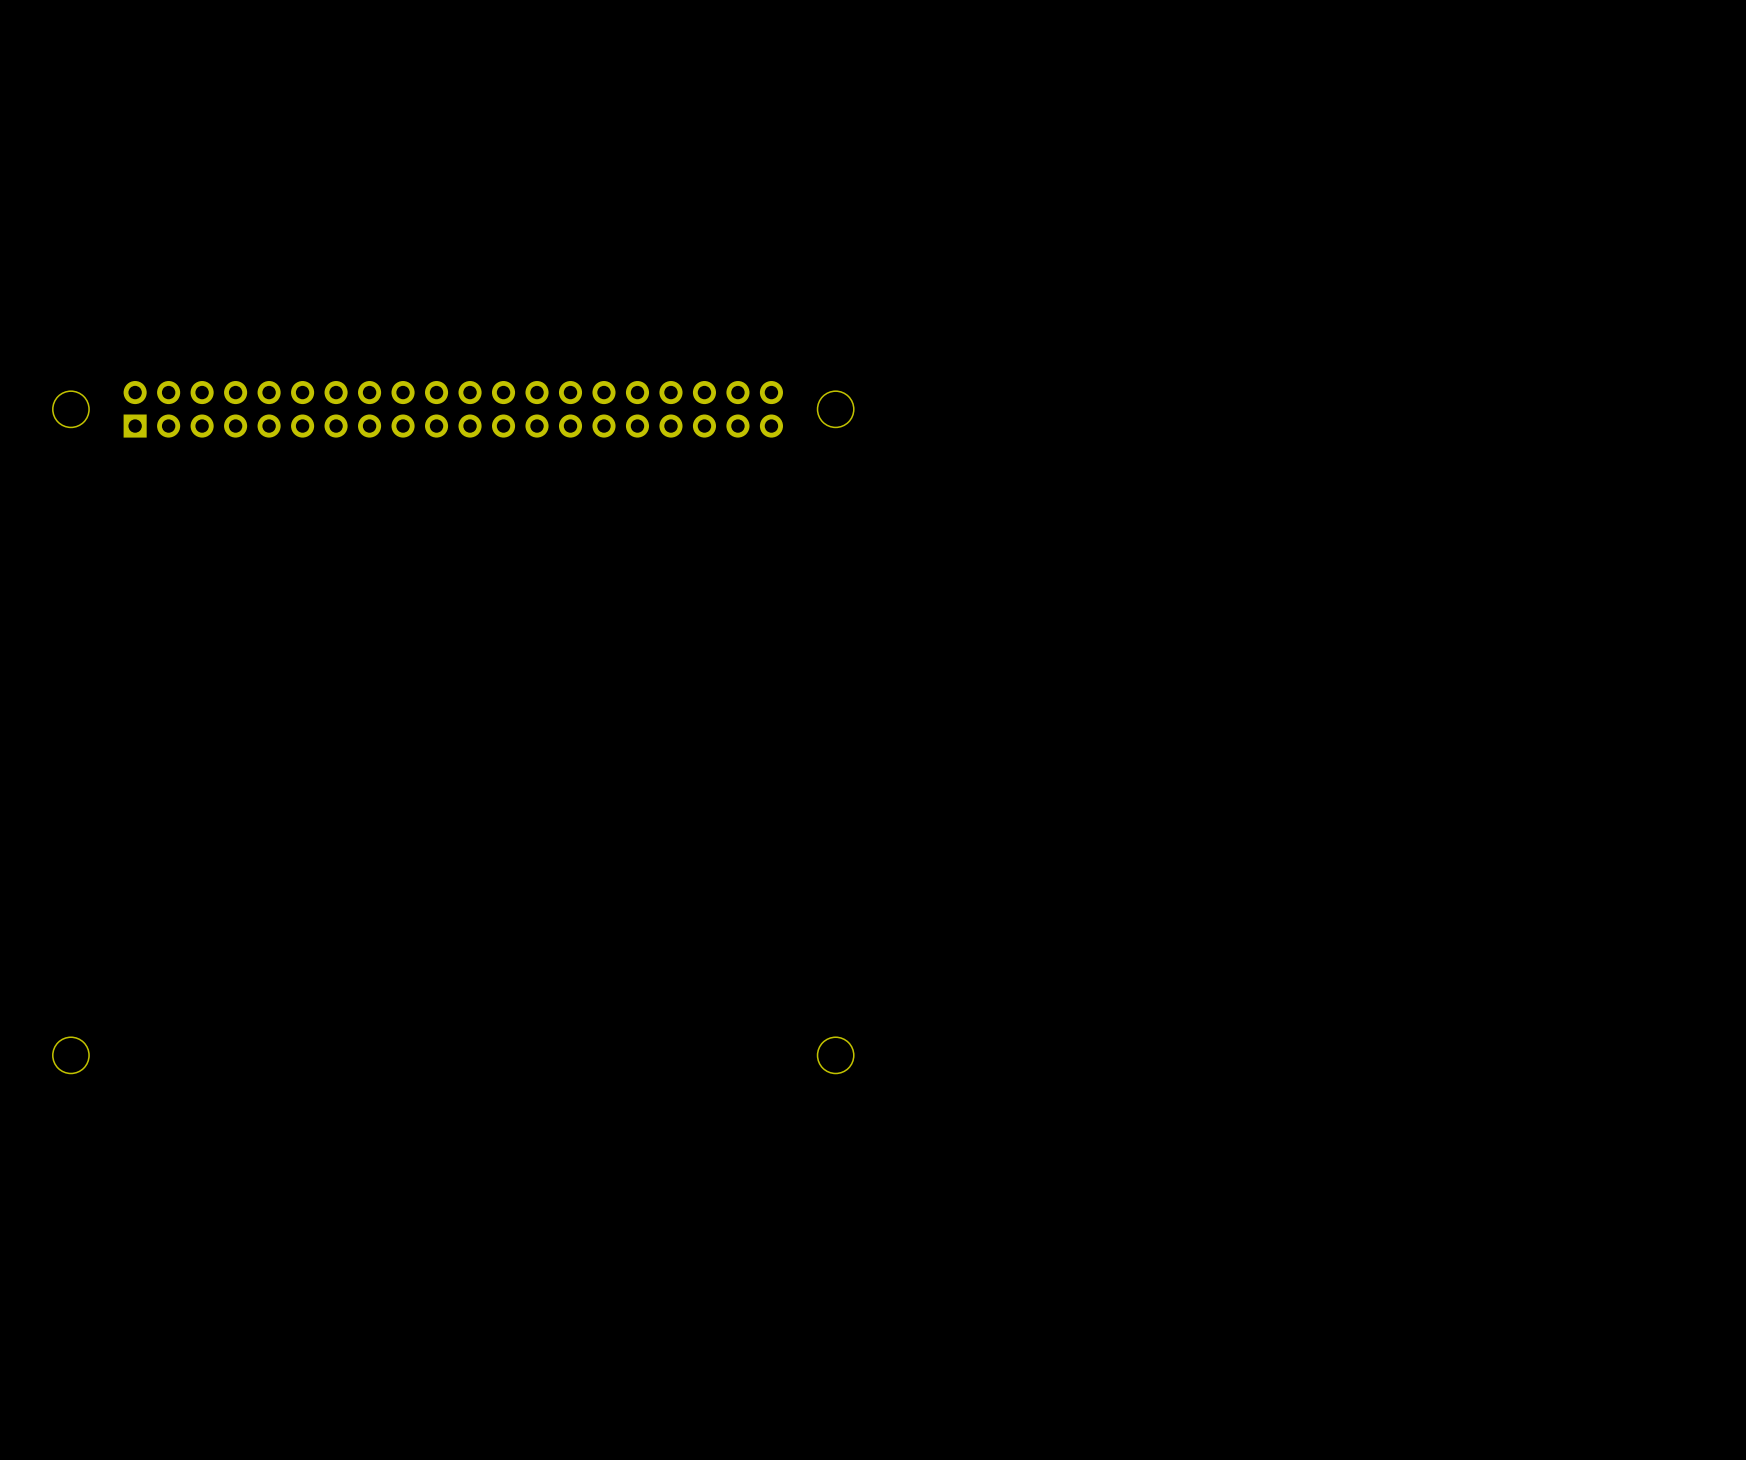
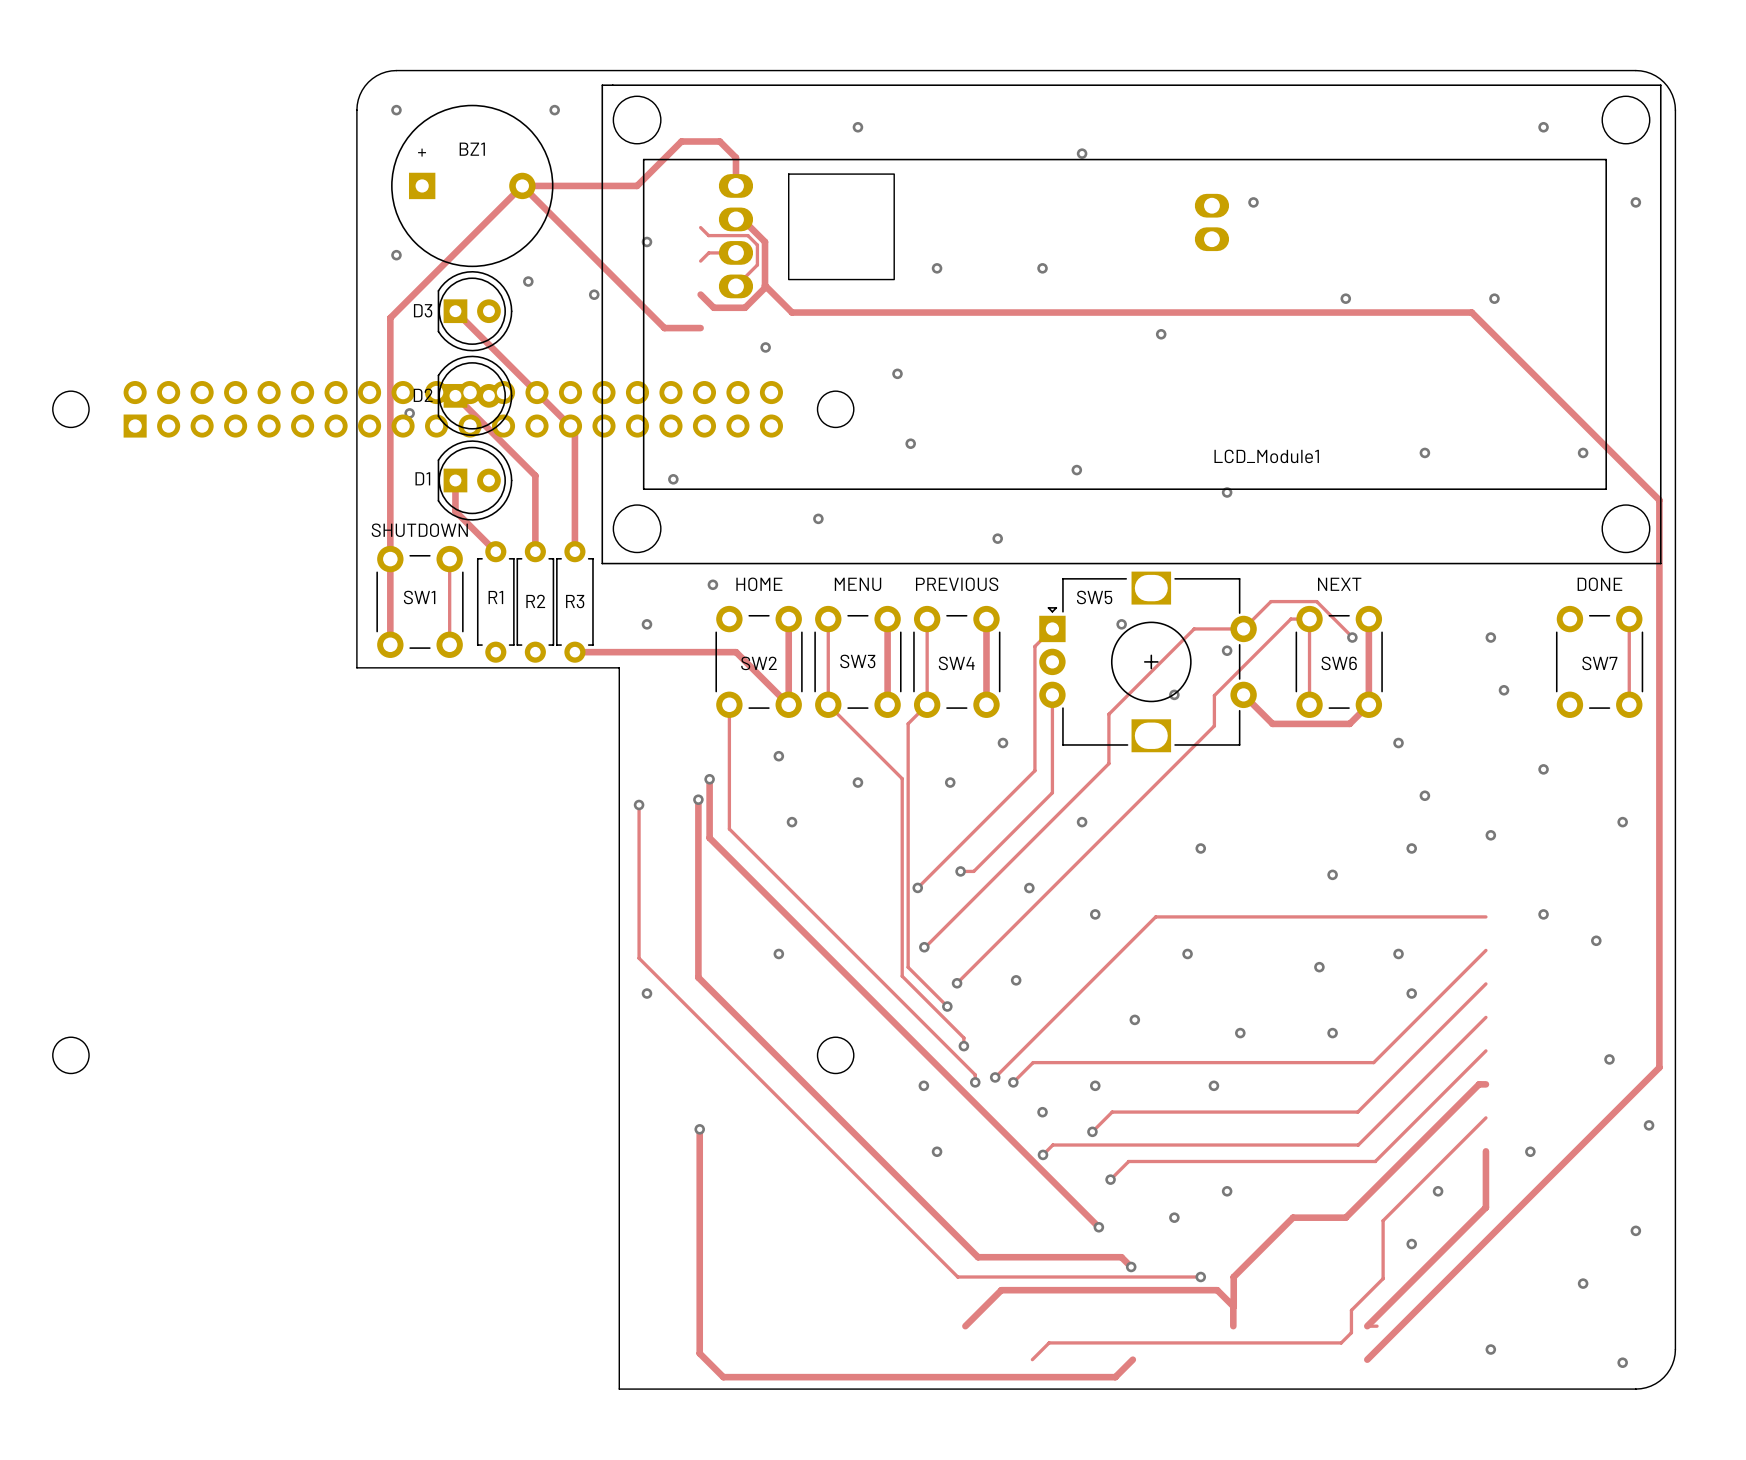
board edge: none -> (396, 70) (1635, 70) (1650, 73) (1663, 82) (1672, 94) (1675, 110) (1675, 1349) (1672, 1364) (1663, 1377) (1650, 1386) (1635, 1389) (619, 1389) (619, 667) (356, 667) (357, 104) (362, 90) (372, 78) (386, 71) (396, 70)
via: none -> (396, 110)
via: none -> (554, 110)
via: none -> (857, 127)
via: none -> (1543, 127)
via: none -> (1082, 153)
BZ1: none -> (472, 185)
track: none -> (522, 185) (390, 317) (390, 644)
track: none -> (522, 185) (664, 328) (700, 328)
track: none -> (522, 185) (637, 185) (681, 141) (719, 141) (735, 157) (735, 185)
via: none -> (1253, 202)
via: none -> (1635, 202)
track: none -> (735, 219) (742, 219) (765, 241) (765, 287) (745, 307) (713, 307) (700, 294)
track: none -> (700, 227) (708, 235) (747, 235) (757, 245) (757, 264) (735, 286)
via: none -> (646, 241)
track: none -> (735, 252) (708, 252) (700, 261)
via: none -> (396, 255)
via: none -> (937, 268)
via: none -> (1042, 268)
via: none -> (528, 281)
track: none -> (765, 285) (792, 312) (1471, 312) (1659, 500) (1659, 1067) (1367, 1359)
via: none -> (594, 294)
via: none -> (1345, 298)
via: none -> (1494, 298)
track: none -> (455, 311) (574, 430) (574, 551)
D3: none -> (475, 311)
LCD_Module1: none -> (1131, 324)
via: none -> (1161, 334)
via: none -> (765, 347)
via: none -> (897, 373)
track: none -> (455, 395) (535, 475) (535, 551)
D2: none -> (475, 395)
via: none -> (409, 413)
via: none -> (910, 443)
via: none -> (1424, 452)
via: none -> (1583, 452)
via: none -> (1076, 470)
via: none -> (673, 479)
track: none -> (455, 480) (455, 511) (495, 551)
D1: none -> (475, 480)
via: none -> (1227, 492)
via: none -> (818, 518)
via: none -> (997, 538)
track: none -> (449, 559) (449, 644)
via: none -> (712, 584)
SW1: none -> SHUTDOWN (420, 601)
R1: none -> (495, 601)
R2: none -> (535, 601)
R3: none -> (574, 601)
track: none -> (788, 619) (788, 704) (736, 652) (574, 652)
track: none -> (828, 619) (828, 704) (902, 778) (902, 976) (963, 1037) (963, 1046)
track: none -> (887, 619) (887, 704)
track: none -> (927, 619) (927, 704) (908, 723) (908, 967) (947, 1006)
track: none -> (986, 619) (986, 704)
track: none -> (1368, 619) (1368, 704) (1349, 723) (1272, 723) (1243, 694)
track: none -> (1629, 619) (1629, 704)
via: none -> (646, 624)
via: none -> (1121, 624)
track: none -> (1052, 628) (1034, 646) (1034, 770) (917, 887)
track: none -> (1352, 637) (1316, 601) (1270, 601) (1243, 628) (1194, 628) (1108, 714) (1108, 763) (924, 947)
via: none -> (1352, 637)
via: none -> (1490, 637)
via: none -> (1227, 650)
SW2: none -> HOME (759, 661)
SW3: none -> MENU (857, 661)
SW4: none -> PREVIOUS (956, 661)
SW5: none -> (1148, 661)
SW6: none -> NEXT (1339, 661)
SW7: none -> DONE (1599, 661)
via: none -> (1504, 690)
track: none -> (1052, 694) (1052, 792) (973, 871) (960, 871)
via: none -> (1174, 694)
track: none -> (729, 704) (729, 829) (975, 1074) (975, 1082)
track: none -> (1309, 704) (1309, 619) (1290, 619) (1214, 695) (1214, 725) (957, 983)
via: none -> (1002, 743)
via: none -> (1398, 743)
via: none -> (778, 756)
via: none -> (1543, 769)
track: none -> (709, 779) (709, 838) (1098, 1227)
via: none -> (709, 779)
via: none -> (857, 782)
via: none -> (950, 782)
via: none -> (1424, 795)
track: none -> (698, 799) (698, 977) (978, 1257) (1121, 1257) (1131, 1266)
via: none -> (698, 799)
track: none -> (639, 804) (639, 958) (957, 1277) (1200, 1277)
via: none -> (639, 804)
via: none -> (792, 822)
via: none -> (1082, 822)
via: none -> (1622, 822)
via: none -> (1490, 835)
via: none -> (1200, 848)
via: none -> (1411, 848)
via: none -> (960, 871)
via: none -> (1332, 874)
via: none -> (917, 887)
via: none -> (1029, 888)
via: none -> (1095, 914)
via: none -> (1543, 914)
track: none -> (1485, 916) (1155, 916) (995, 1077)
via: none -> (1596, 940)
via: none -> (924, 947)
track: none -> (1485, 950) (1373, 1062) (1033, 1062) (1013, 1082)
via: none -> (778, 953)
via: none -> (1187, 953)
via: none -> (1398, 953)
via: none -> (1319, 967)
via: none -> (1016, 980)
via: none -> (957, 983)
track: none -> (1485, 983) (1357, 1112) (1112, 1112) (1092, 1131)
via: none -> (646, 993)
via: none -> (1411, 993)
via: none -> (947, 1006)
track: none -> (1485, 1017) (1358, 1145) (1052, 1145) (1042, 1154)
via: none -> (1134, 1019)
via: none -> (1240, 1033)
via: none -> (1332, 1033)
via: none -> (963, 1046)
track: none -> (1485, 1050) (1375, 1161) (1128, 1161) (1110, 1179)
via: none -> (1609, 1059)
via: none -> (995, 1077)
via: none -> (975, 1082)
via: none -> (1013, 1082)
track: none -> (1485, 1084) (1479, 1084) (1345, 1217) (1293, 1217) (1233, 1277) (1233, 1306)
via: none -> (923, 1085)
via: none -> (1095, 1085)
via: none -> (1213, 1085)
via: none -> (1042, 1112)
track: none -> (1485, 1117) (1383, 1220) (1383, 1278) (1351, 1310) (1351, 1332) (1341, 1342) (1049, 1342) (1032, 1359)
via: none -> (1649, 1125)
track: none -> (699, 1129) (699, 1353) (723, 1377) (1115, 1377) (1132, 1359)
via: none -> (699, 1129)
via: none -> (1092, 1131)
via: none -> (937, 1151)
track: none -> (1485, 1151) (1485, 1207) (1367, 1326) (1377, 1326)
via: none -> (1530, 1151)
via: none -> (1042, 1154)
via: none -> (1110, 1179)
via: none -> (1227, 1191)
via: none -> (1438, 1191)
via: none -> (1174, 1217)
via: none -> (1098, 1227)
via: none -> (1635, 1230)
via: none -> (1411, 1244)
via: none -> (1131, 1266)
via: none -> (1200, 1277)
via: none -> (1583, 1283)
track: none -> (1233, 1306) (1217, 1290) (1001, 1290) (965, 1326)
track: none -> (1233, 1306) (1233, 1326)
via: none -> (1490, 1349)
via: none -> (1622, 1362)

